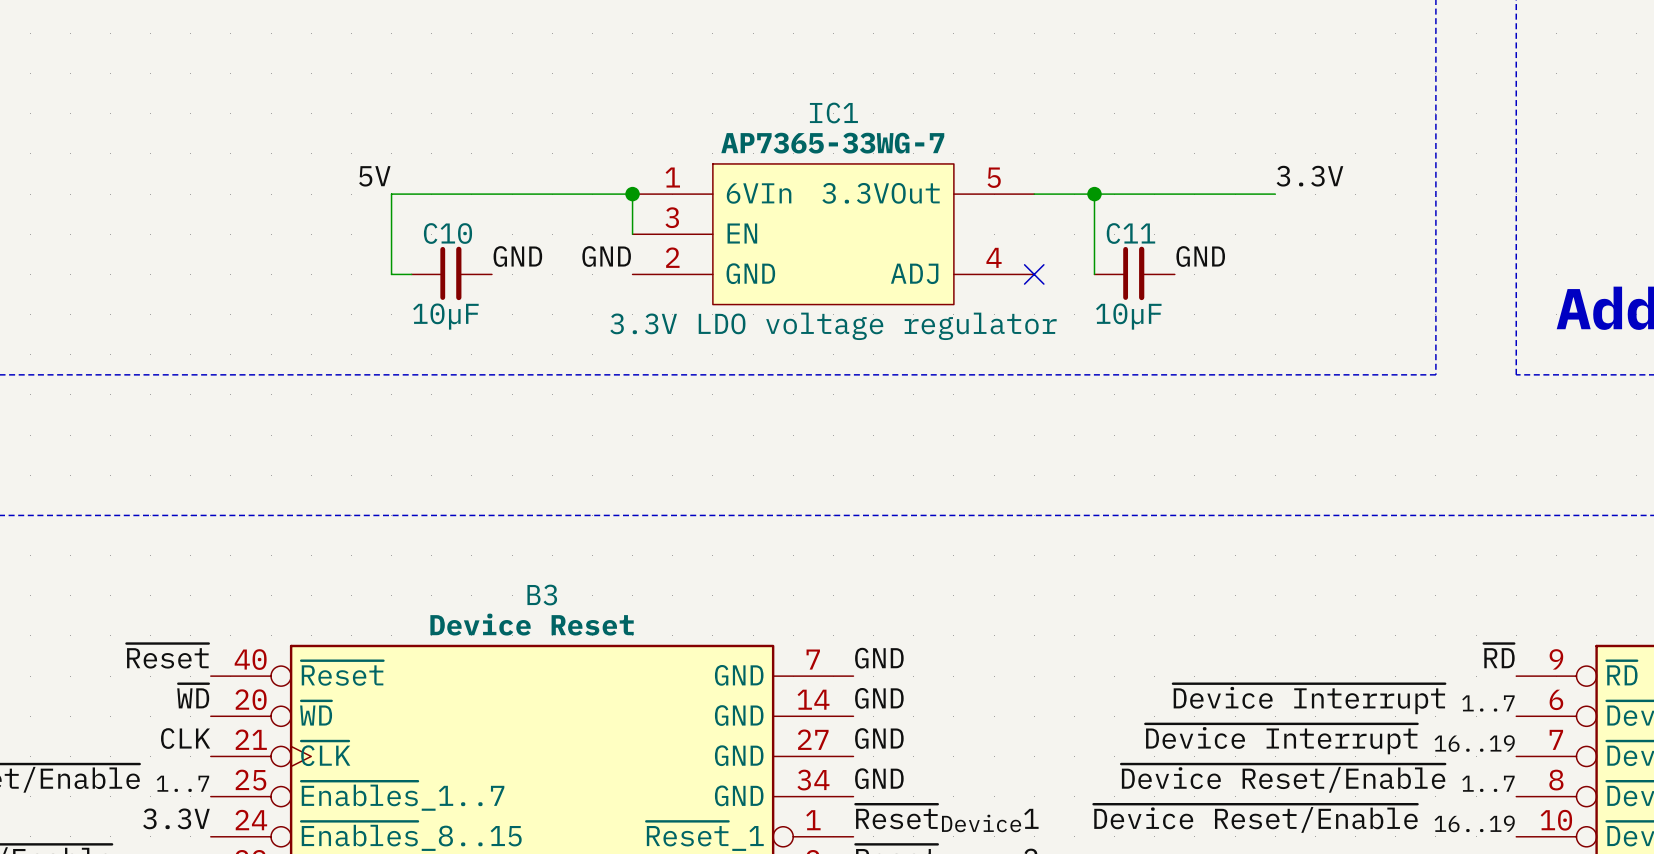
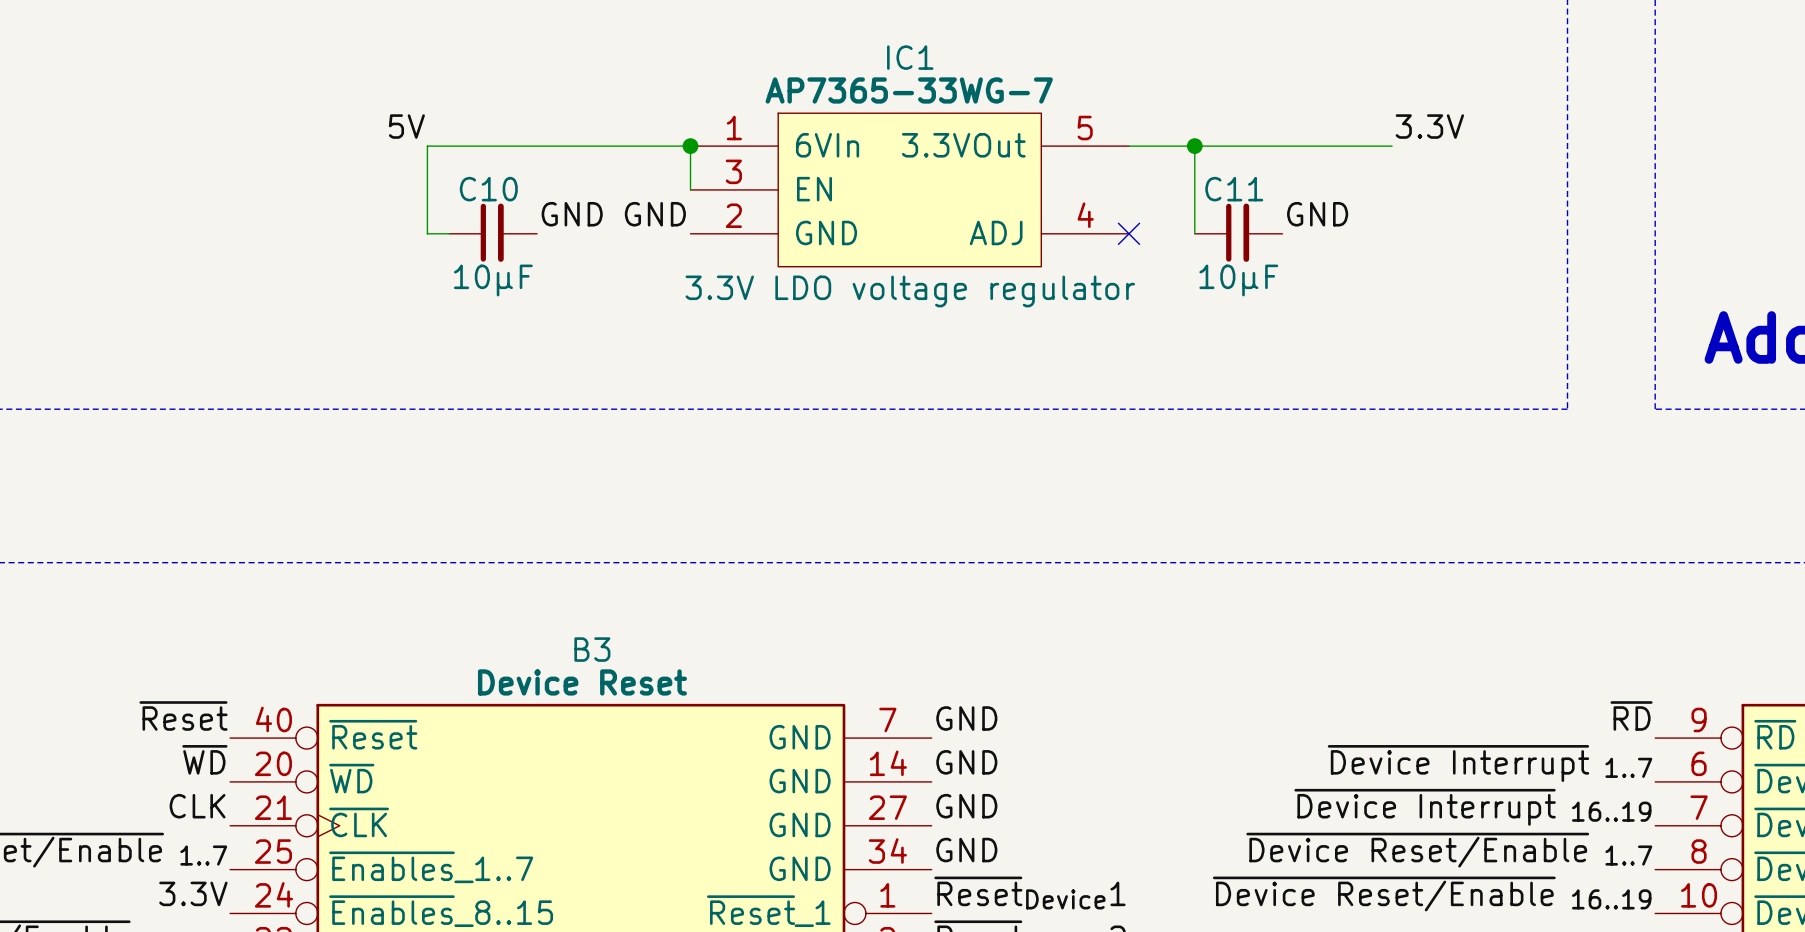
label position: 5V (374, 176) -> 5V (406, 126)
label position: 3.3V (1309, 176) -> 3.3V (1429, 126)
wire: (391, 194) (632, 194) (632, 234) -> (427, 211) (427, 146) (690, 146) (690, 189)
junction position: (632, 194) -> (690, 146)
wire: (1034, 194) (1275, 194) -> (1129, 146) (1392, 146)
junction position: (1094, 194) -> (1194, 146)
wire: (391, 214) (391, 274) (411, 274) -> (427, 233) (449, 233)
wire: (1094, 214) (1094, 274) -> (1194, 146) (1194, 211)
IC1 position: (833, 234) -> (909, 189)
label position: GND (517, 256) -> GND (572, 214)
label position: GND (606, 256) -> GND (655, 214)
label position: GND (1200, 256) -> GND (1317, 214)
C10 position: (451, 273) -> (493, 232)
C11 position: (1134, 273) -> (1238, 232)
no-connect mark position: (1034, 274) -> (1129, 233)

